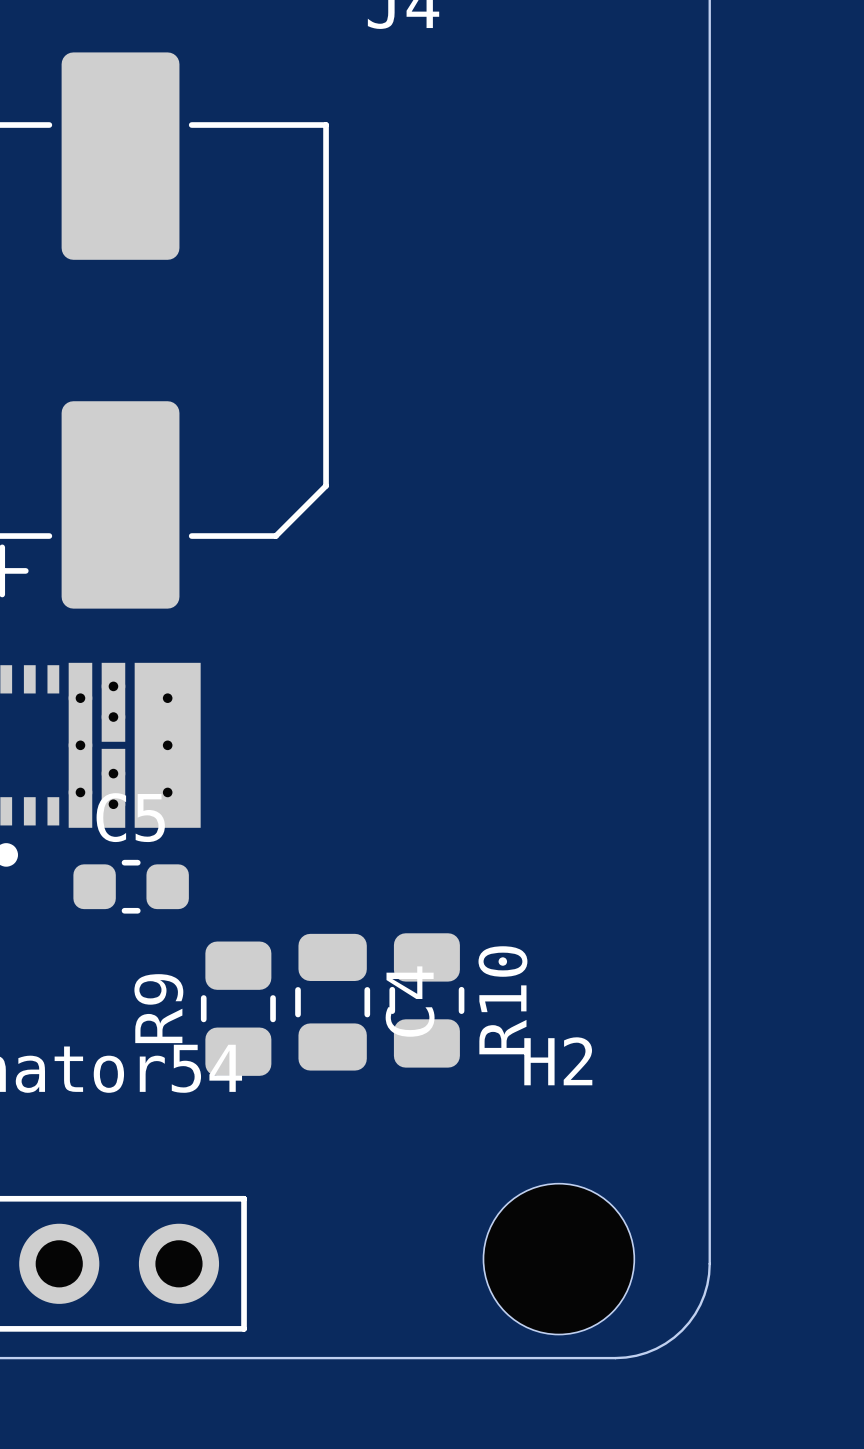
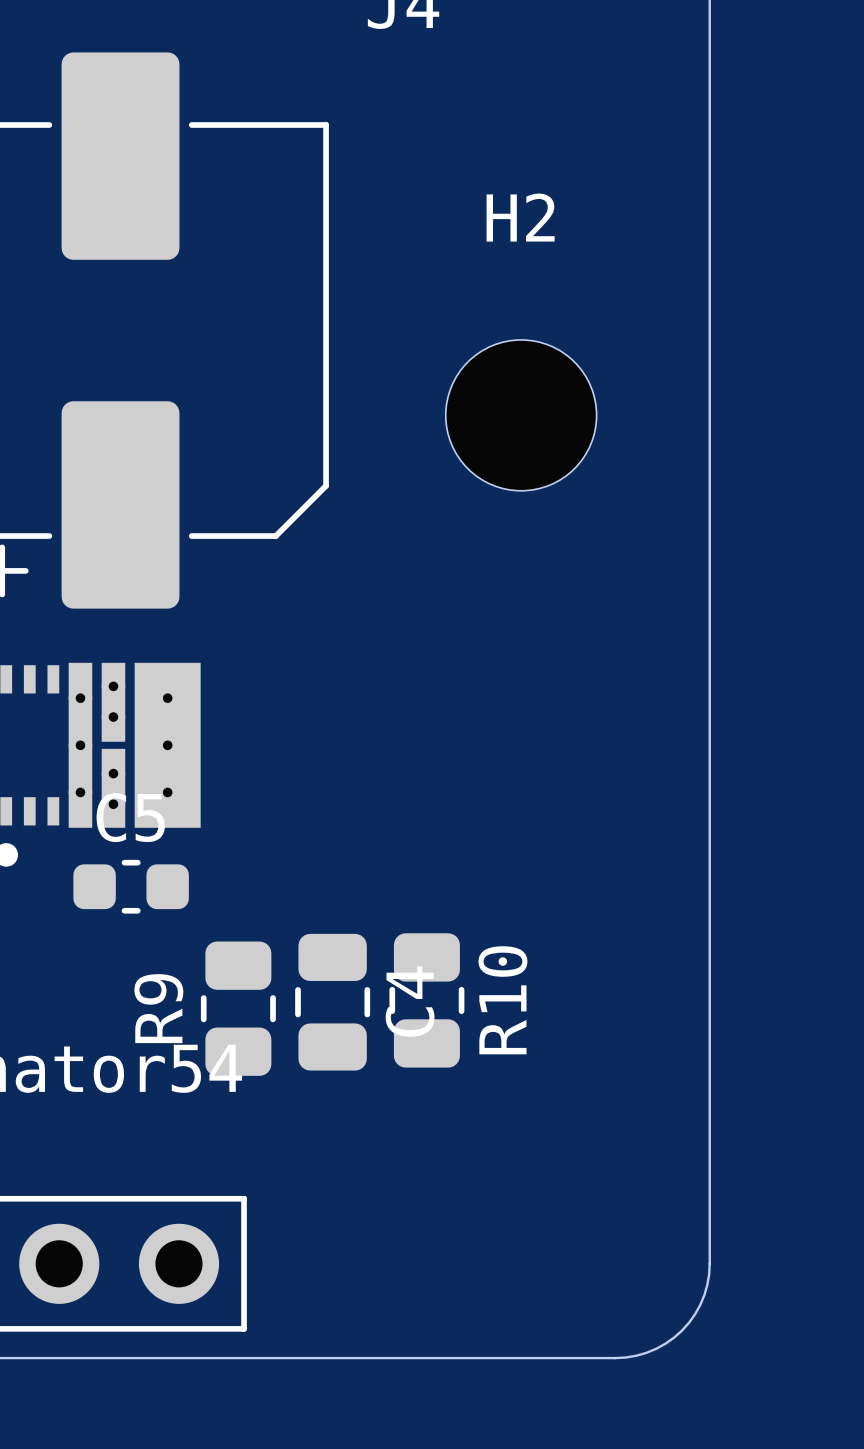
H2 position: (558, 1259) -> (521, 415)

